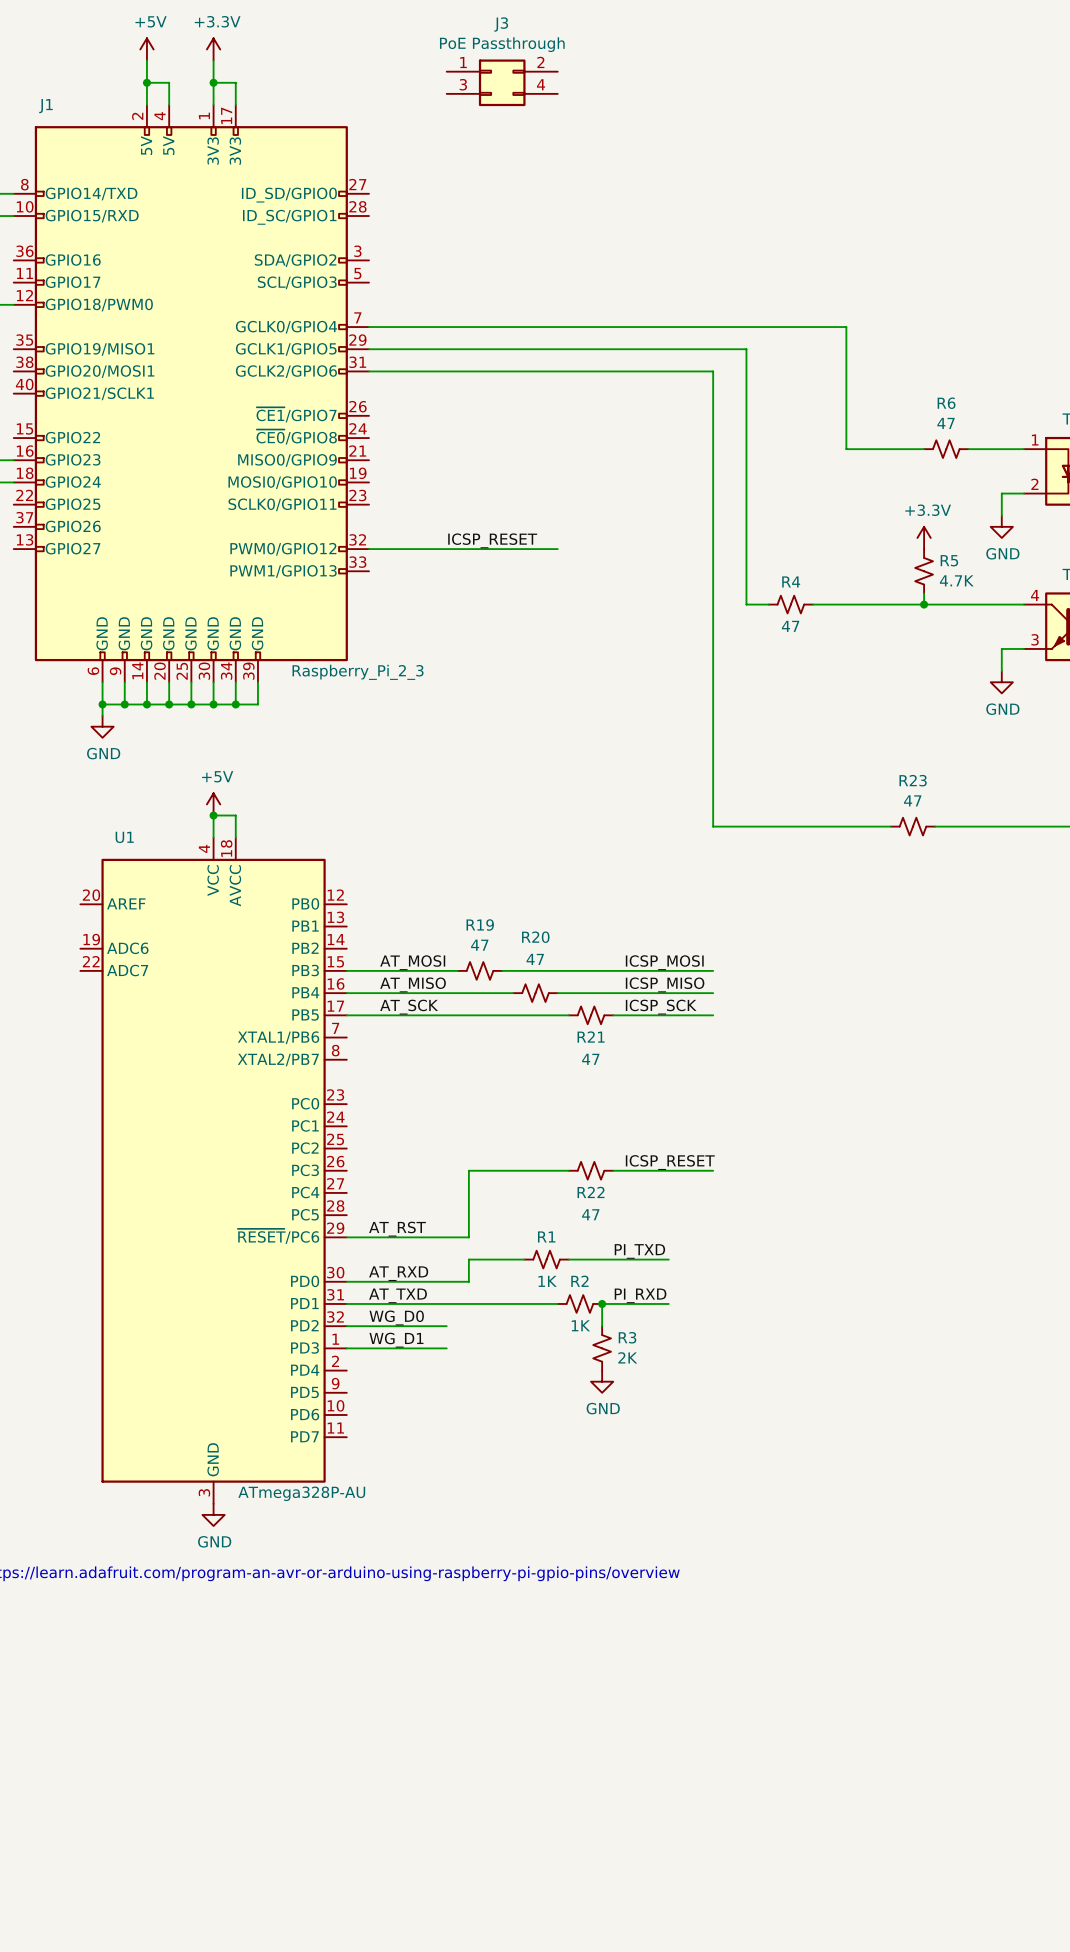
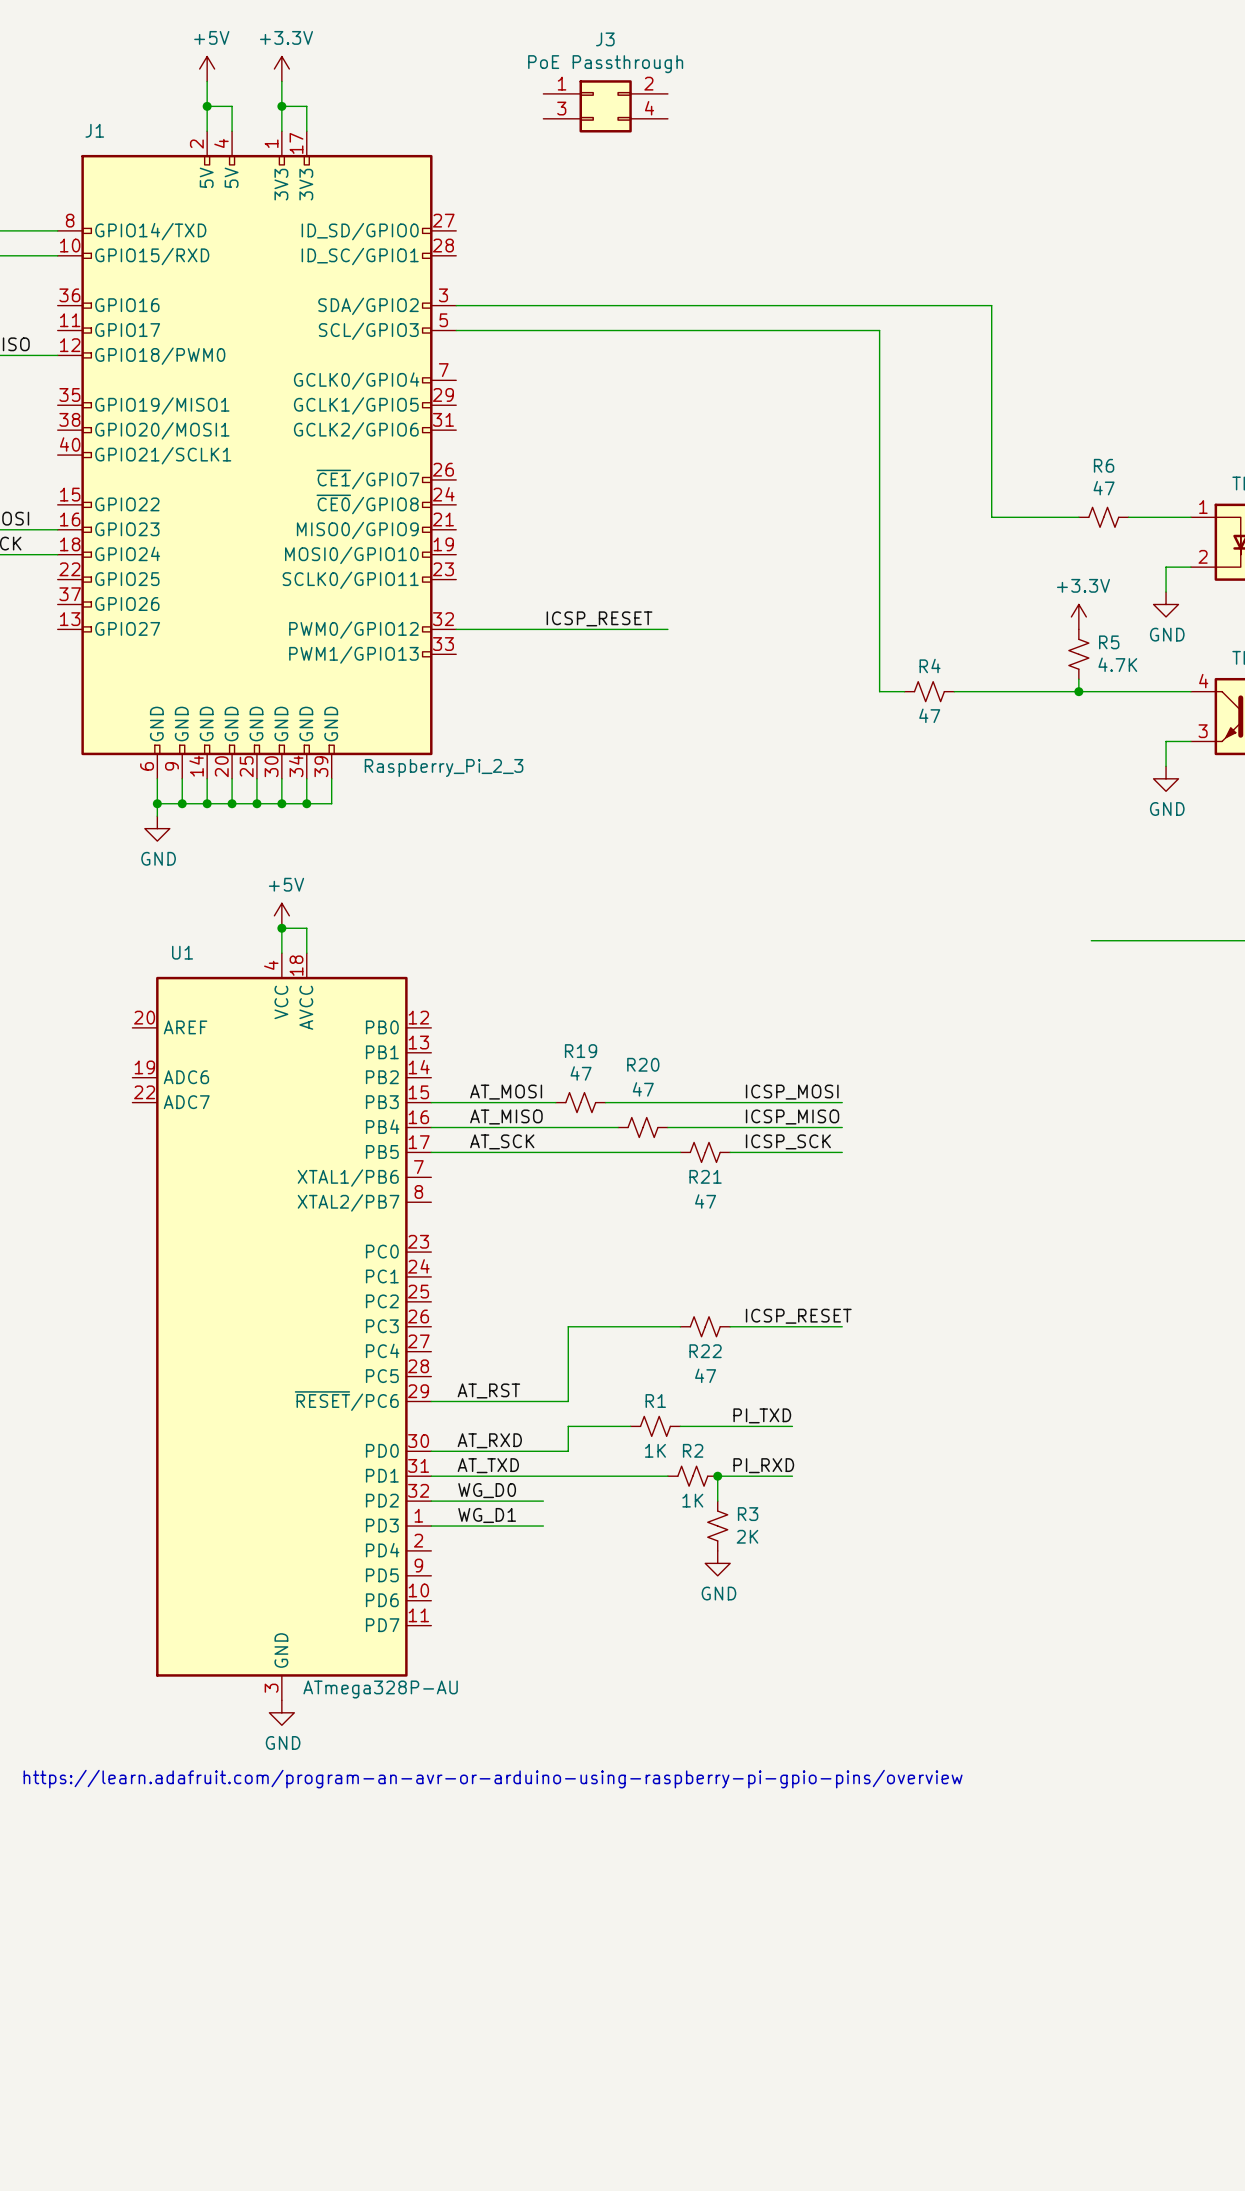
wire: (369, 327) (846, 327) -> (456, 305) (991, 305) (991, 380)
wire: (369, 349) (746, 349) -> (456, 330) (879, 330) (879, 405)
wire: (369, 371) (713, 371) (713, 826) (890, 826) -> none
R23: 47 (912, 826) -> none

